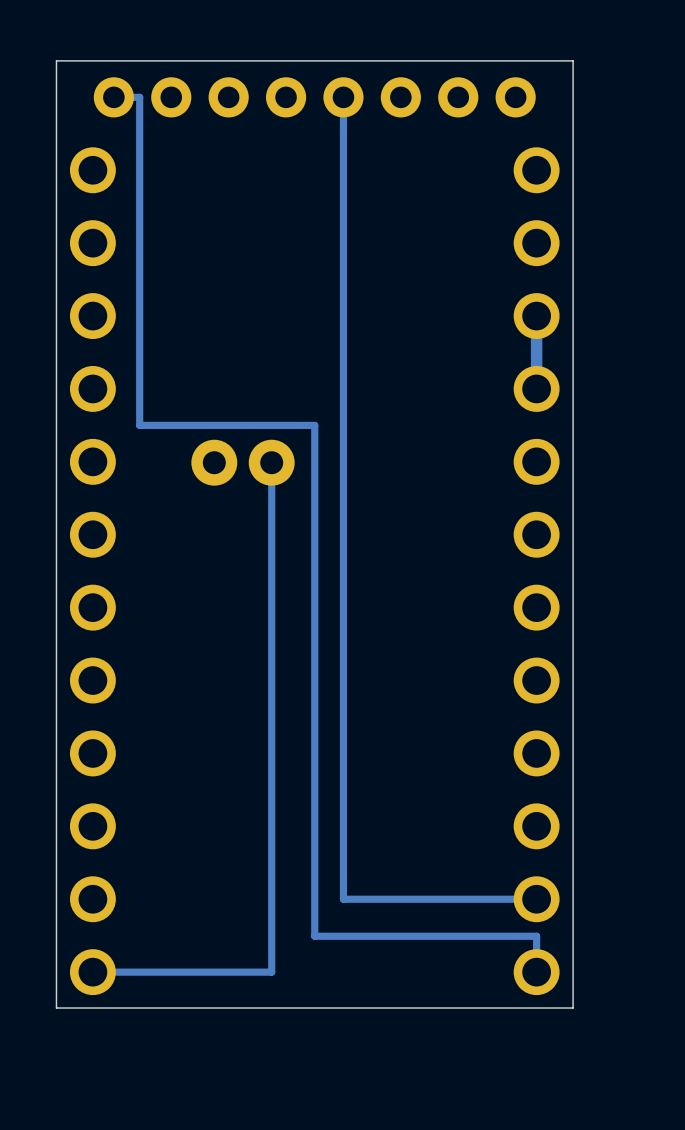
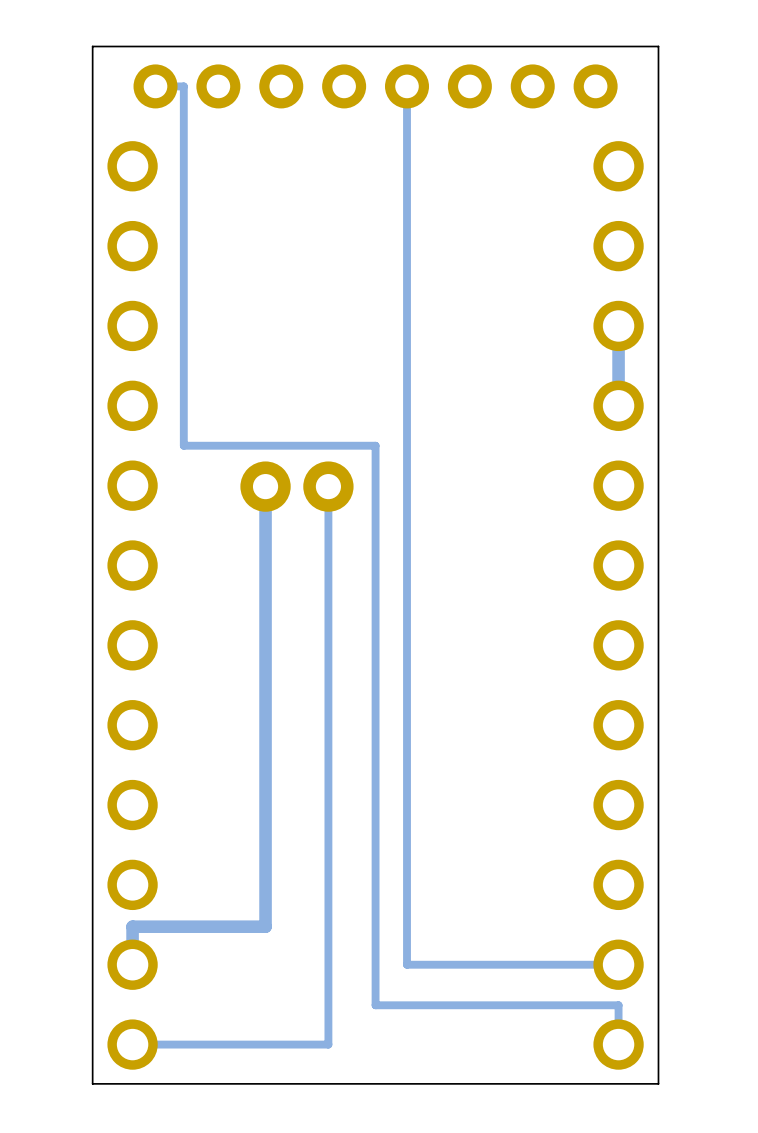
track: none -> (265, 486) (265, 926) (132, 926) (132, 964)

